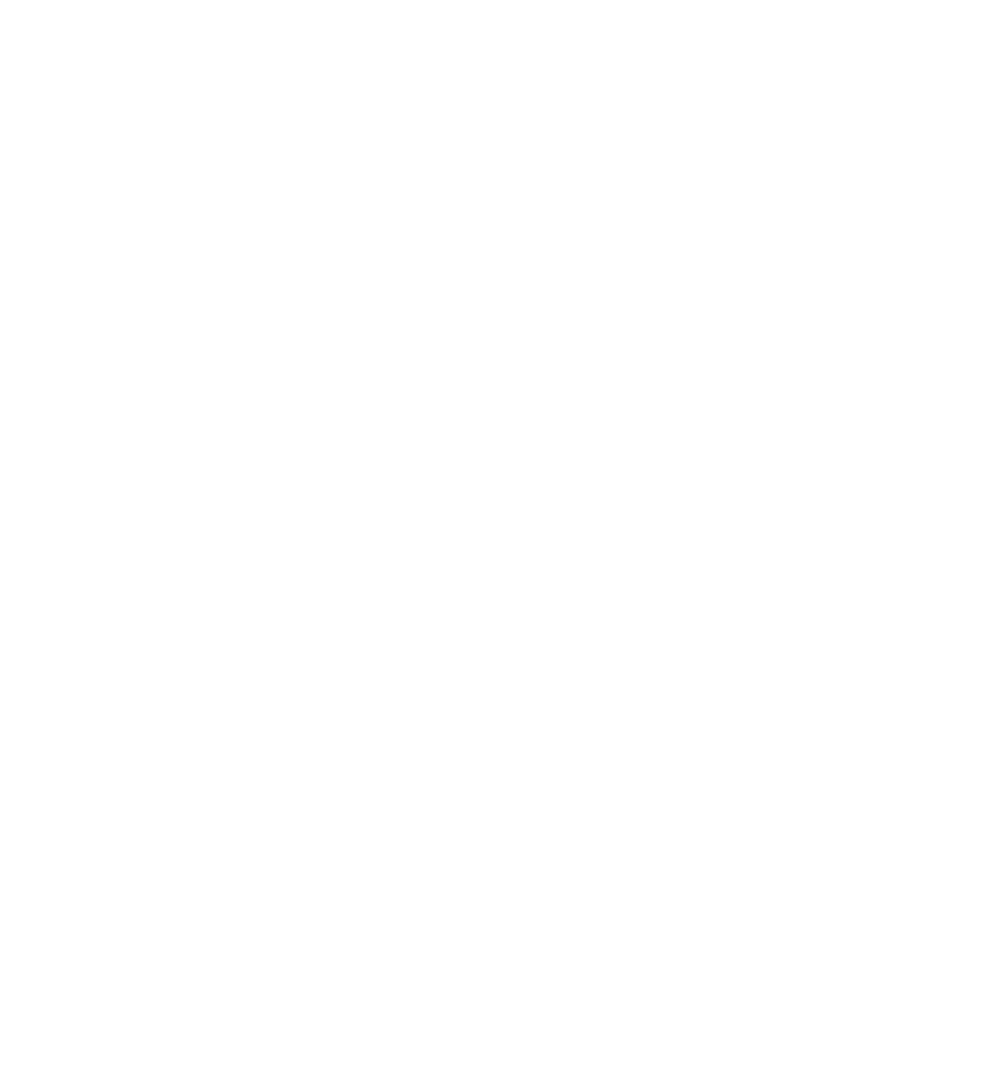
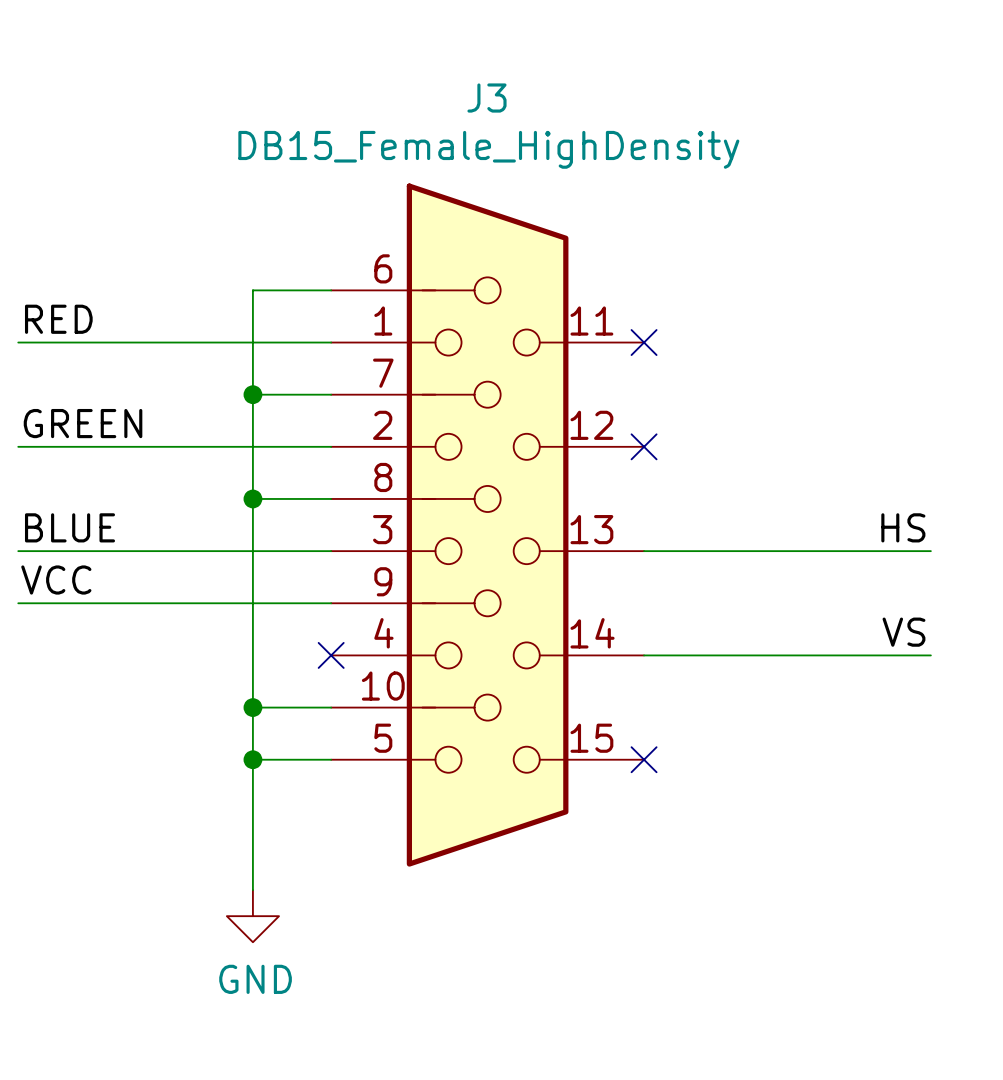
wire: none -> (331, 290) (252, 290) (252, 890)
label: none -> RED (58, 319)
wire: none -> (18, 342) (331, 342)
no-connect mark: none -> (644, 342)
wire: none -> (252, 394) (331, 394)
junction: none -> (252, 394)
label: none -> GREEN (83, 423)
wire: none -> (18, 446) (331, 446)
no-connect mark: none -> (644, 446)
wire: none -> (252, 498) (331, 498)
junction: none -> (252, 498)
J3: none -> DB15_Female_HighDensity (487, 525)
label: none -> HS (903, 527)
label: none -> BLUE (69, 527)
wire: none -> (18, 551) (331, 551)
wire: none -> (644, 551) (930, 551)
label: none -> VCC (56, 580)
wire: none -> (18, 603) (331, 603)
label: none -> VS (903, 632)
no-connect mark: none -> (331, 655)
wire: none -> (644, 655) (930, 655)
wire: none -> (252, 707) (331, 707)
junction: none -> (252, 707)
wire: none -> (252, 759) (331, 759)
junction: none -> (252, 759)
no-connect mark: none -> (644, 759)
power symbol: none -> GND (252, 916)

